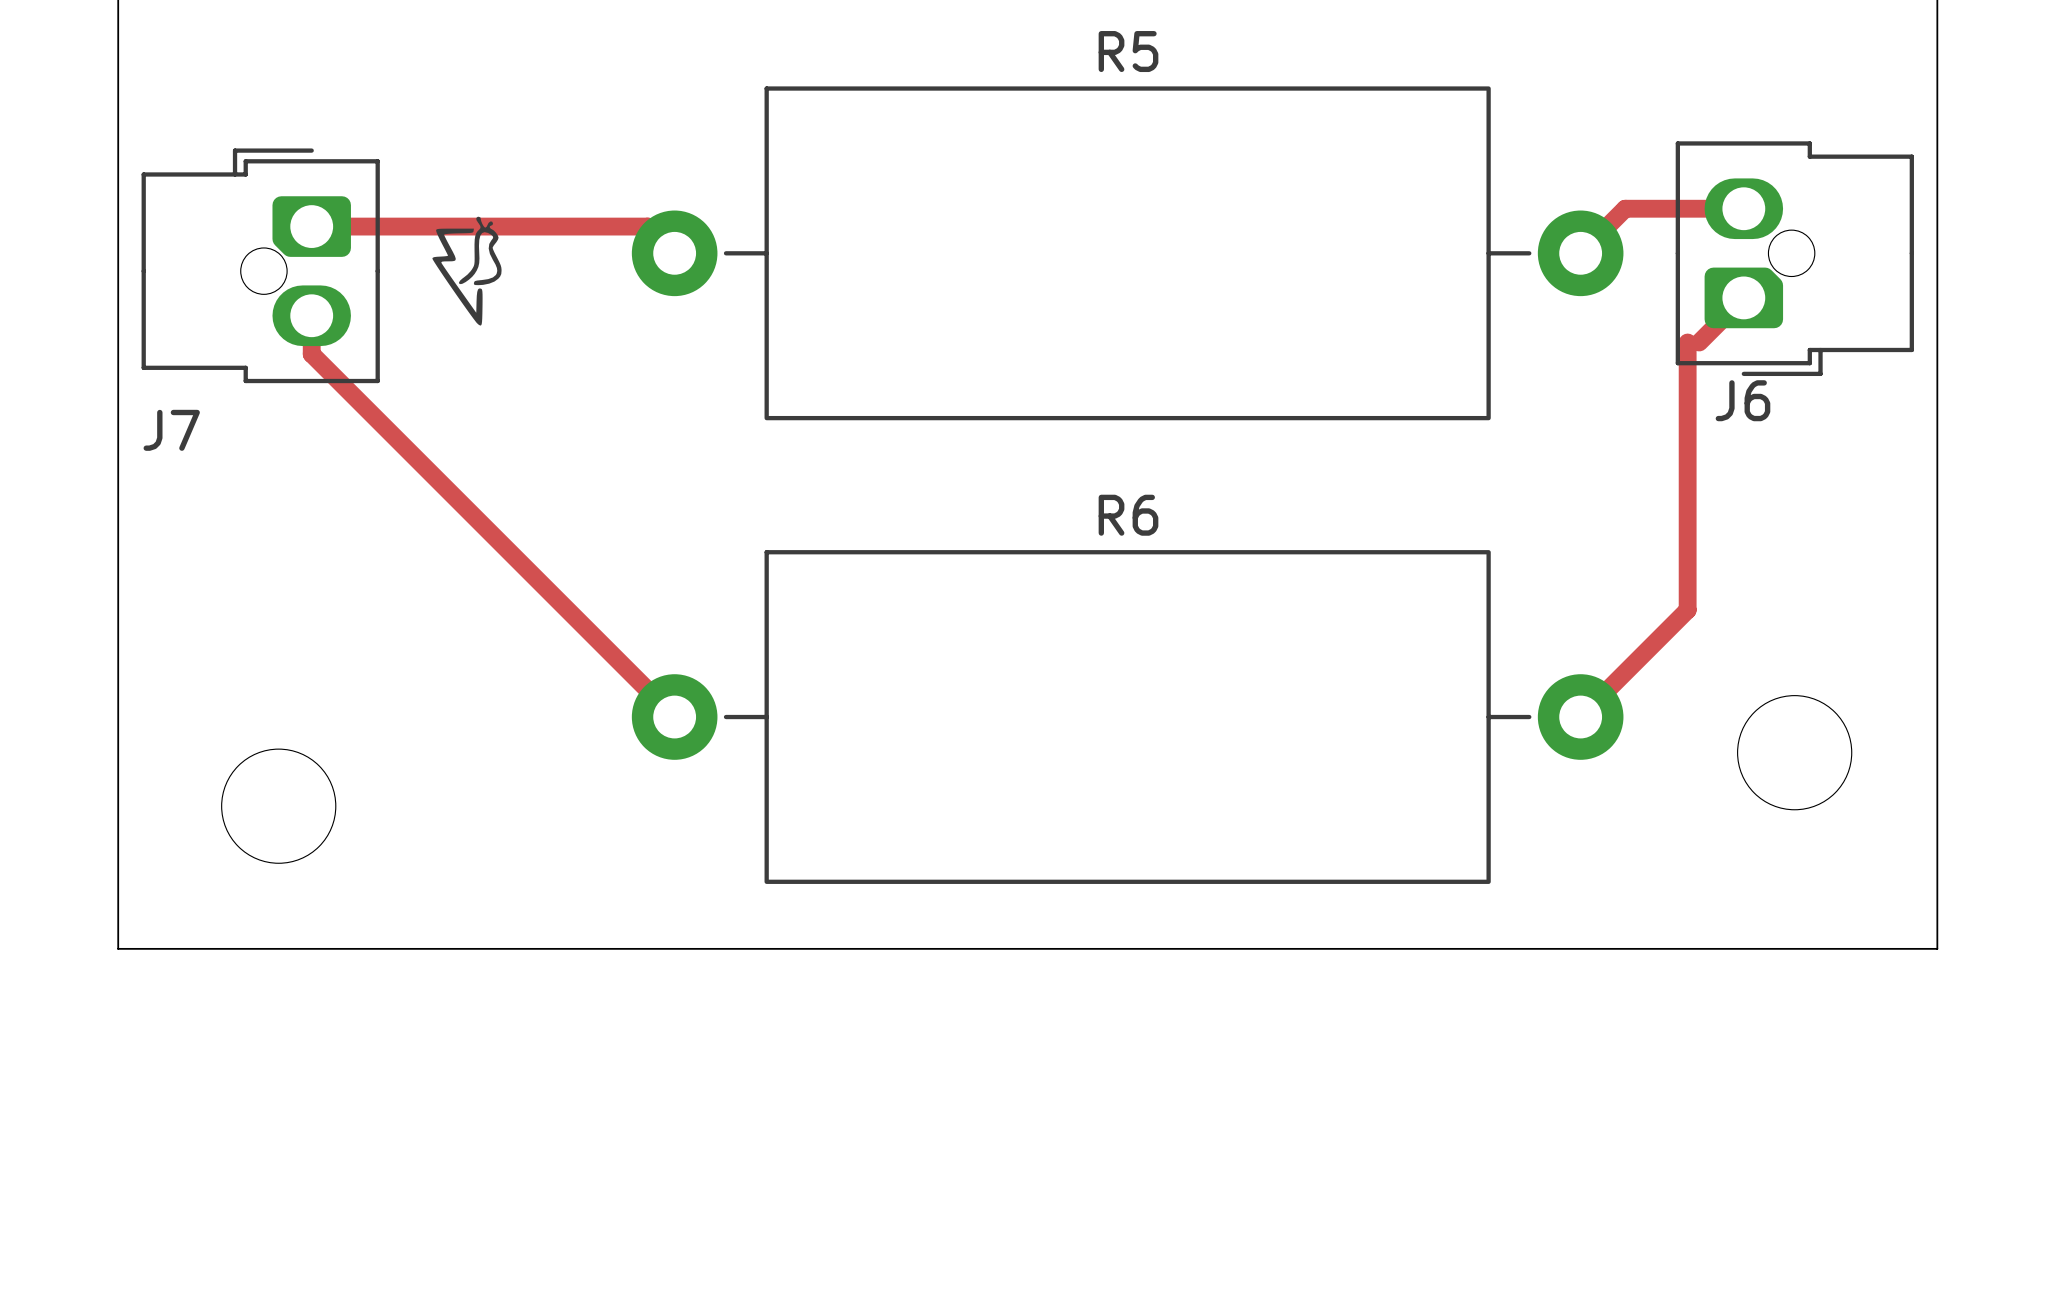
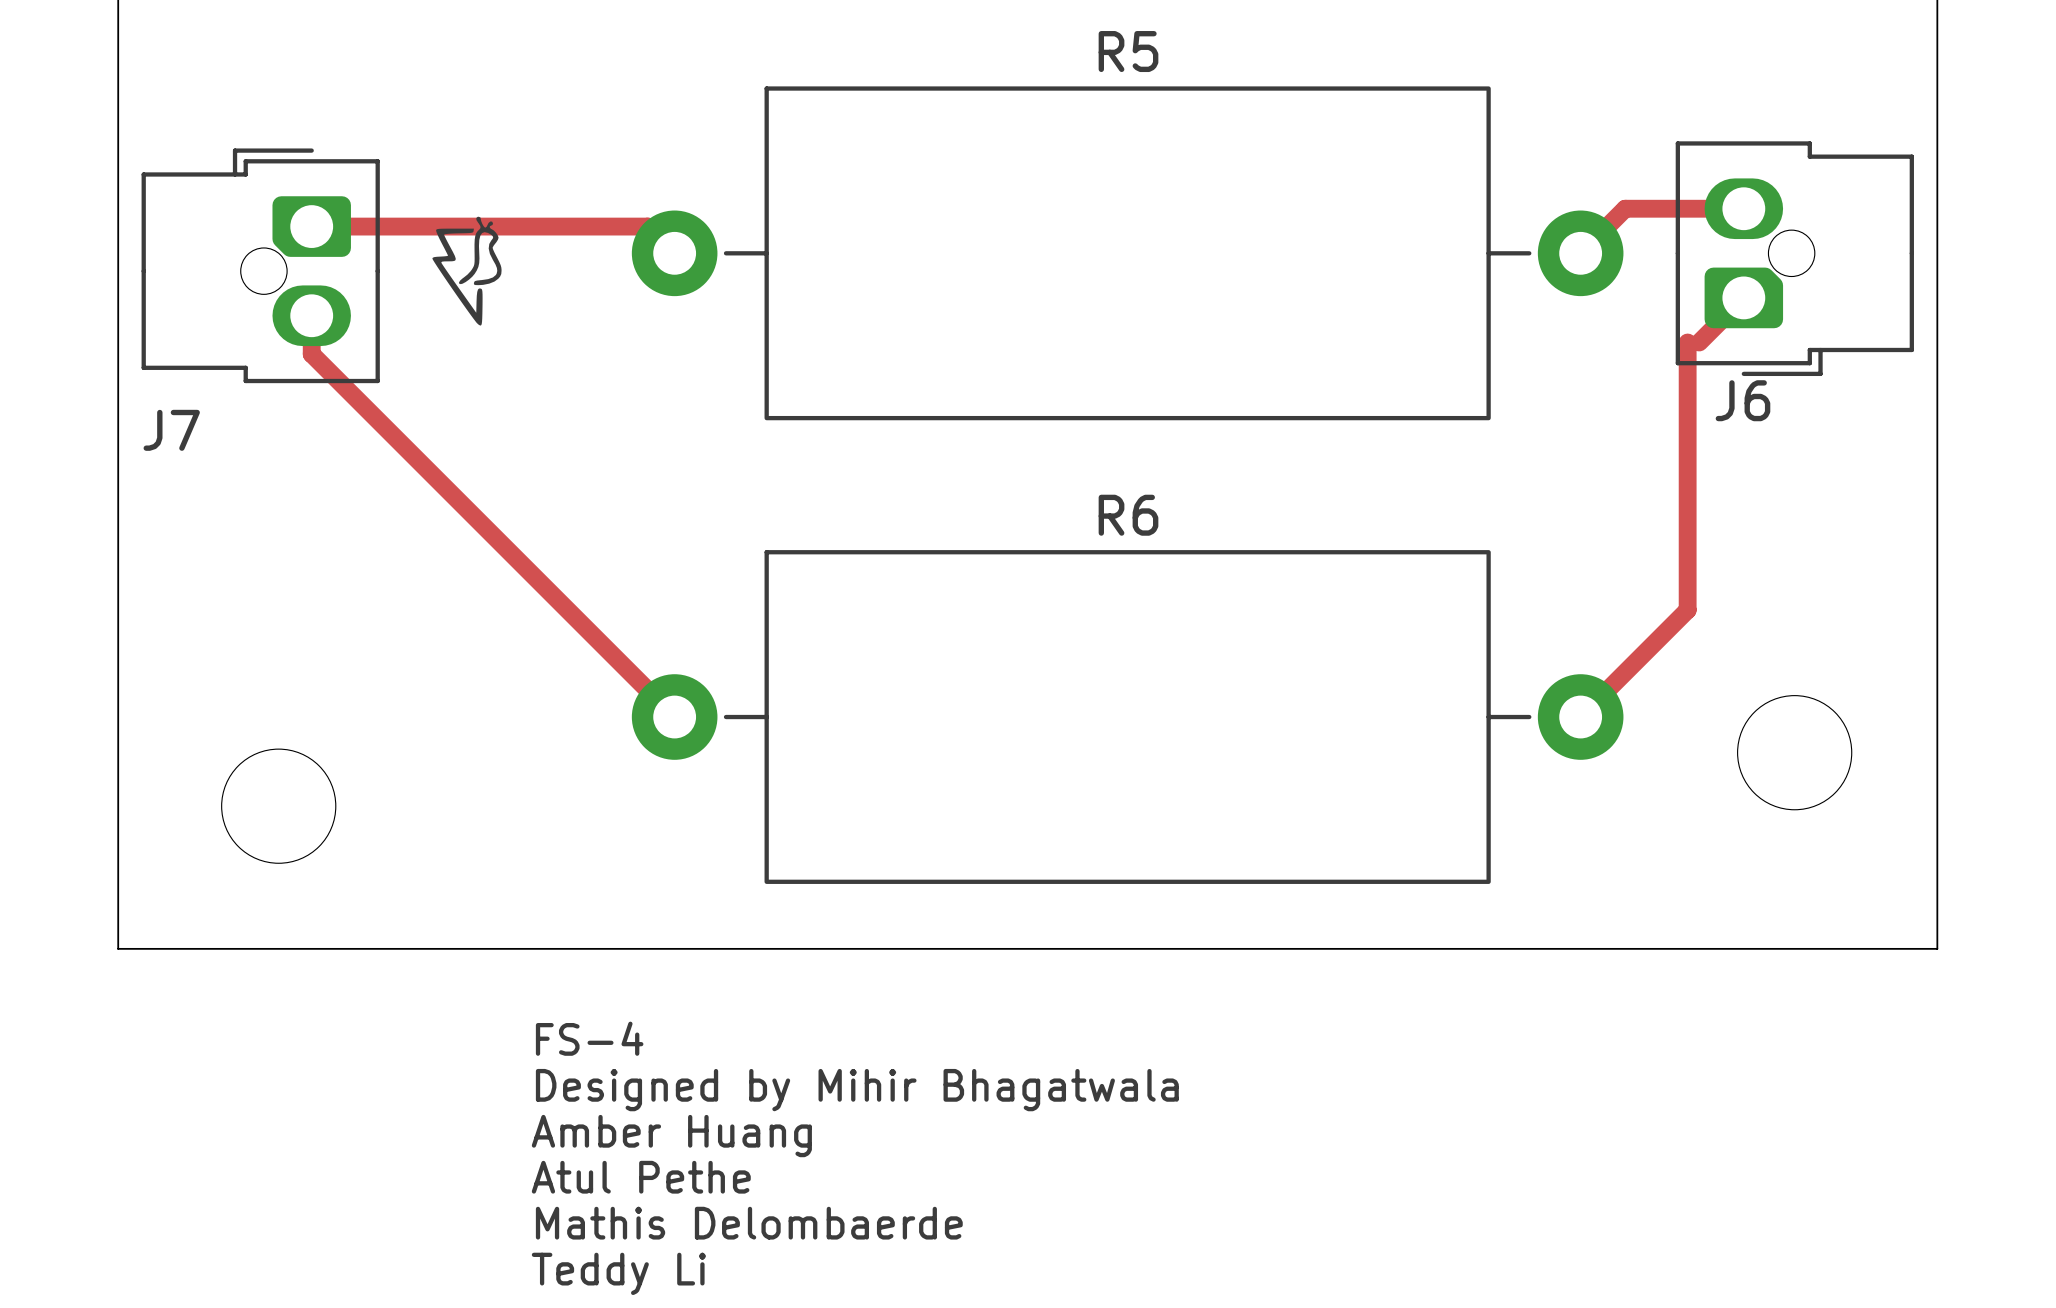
text: none -> FS-4 (589, 1038)
text: none -> Designed by Mihir Bhagatwala (857, 1090)
text: none -> Amber Huang (671, 1136)
text: none -> Atul Pethe (641, 1177)
text: none -> Mathis Delombaerde (749, 1223)
text: none -> Teddy Li (618, 1273)

